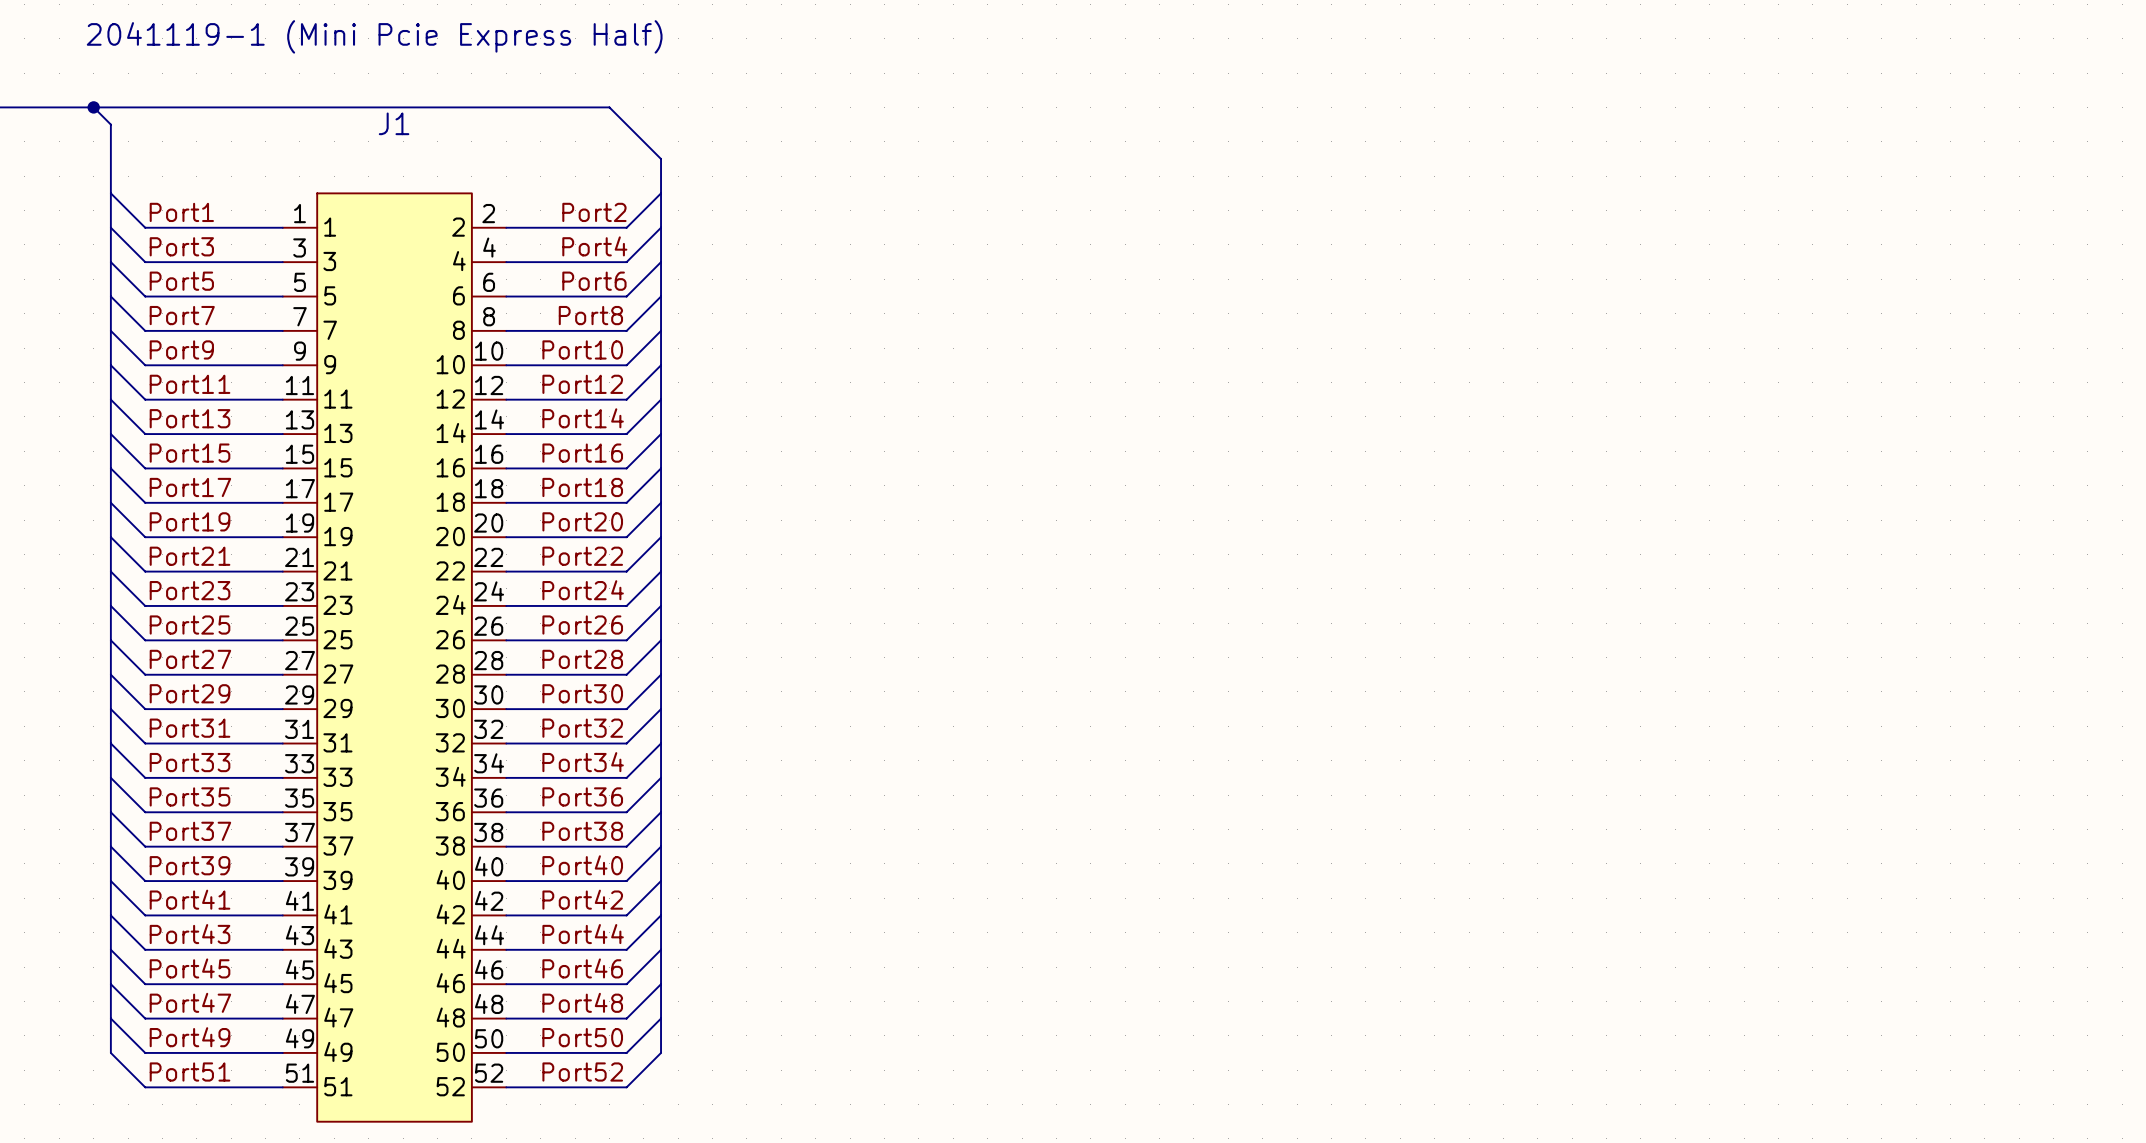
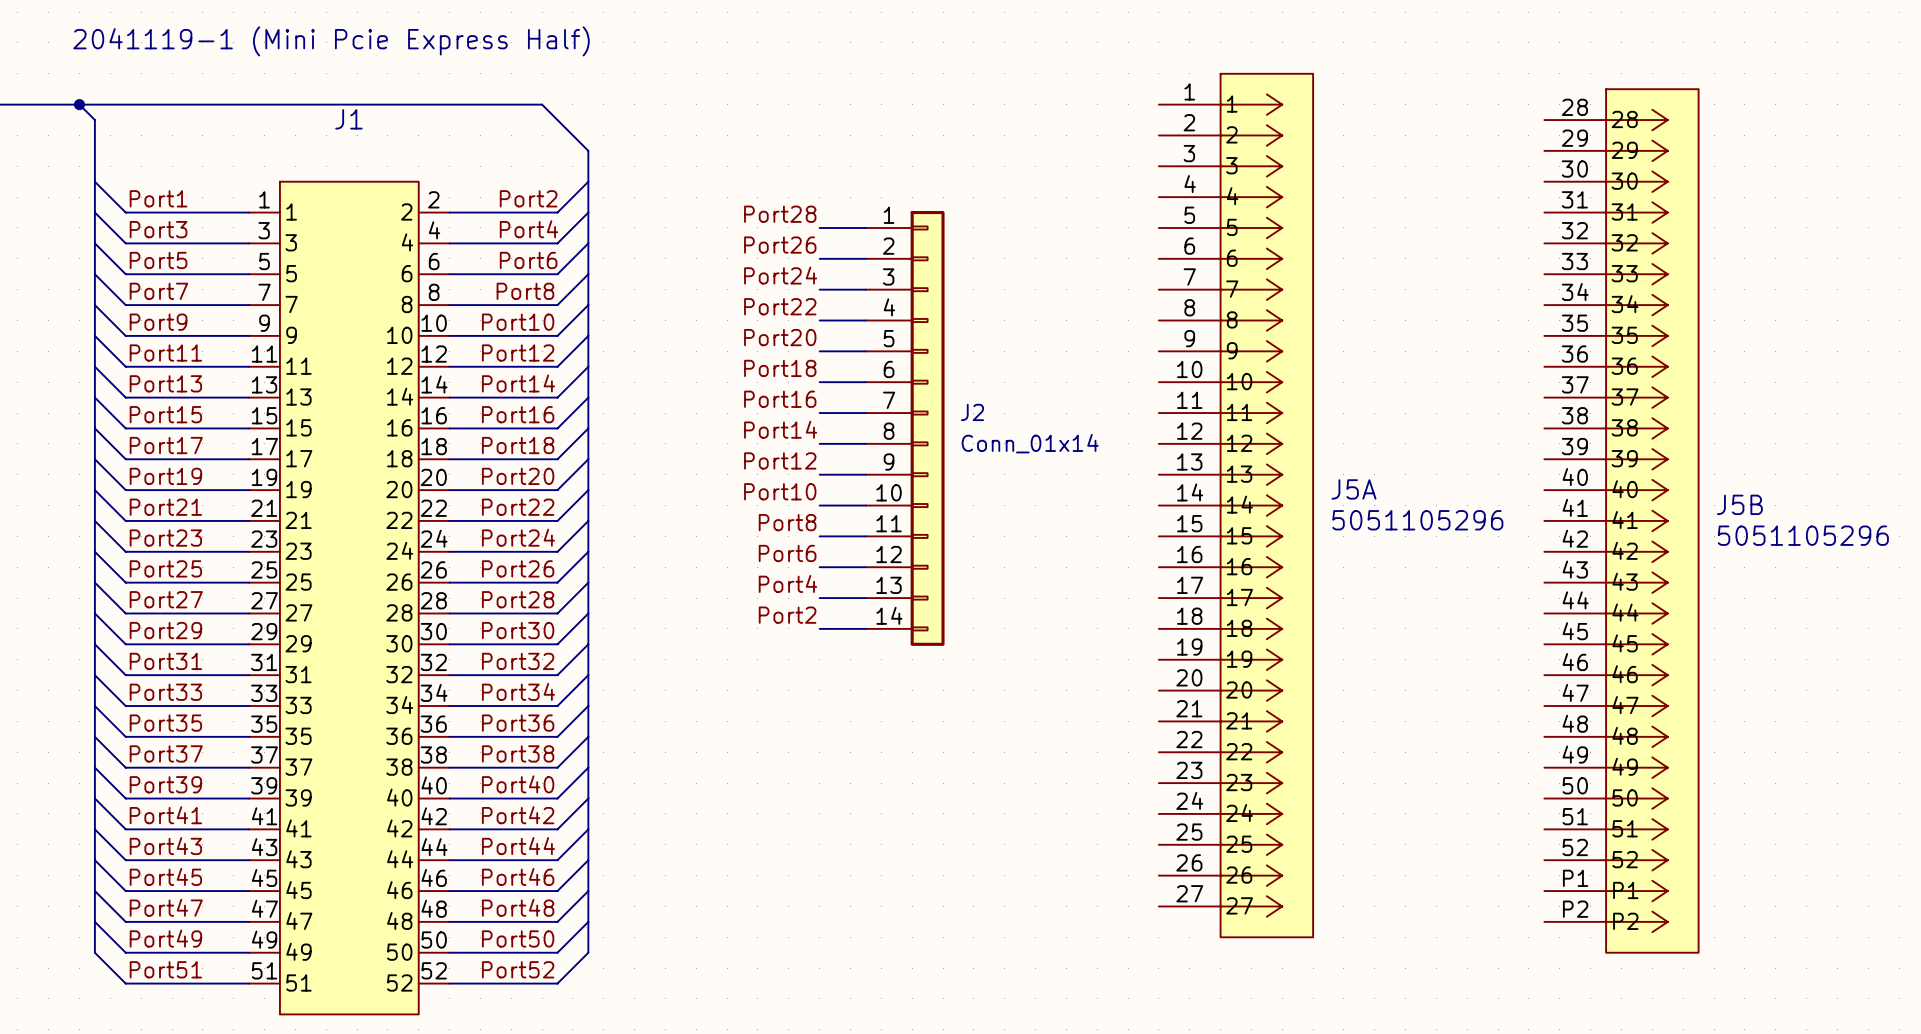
label: none -> Port28 (780, 214)
wire: none -> (819, 227) (865, 227)
label: none -> Port26 (780, 245)
wire: none -> (819, 258) (865, 258)
label: none -> Port24 (780, 275)
wire: none -> (819, 289) (865, 289)
label: none -> Port22 (780, 306)
wire: none -> (819, 320) (865, 320)
label: none -> Port20 (780, 337)
wire: none -> (819, 351) (865, 351)
label: none -> Port18 (780, 368)
wire: none -> (819, 382) (865, 382)
label: none -> Port16 (780, 399)
wire: none -> (819, 413) (865, 413)
J2: none -> Conn_01x14 (905, 428)
label: none -> Port14 (780, 429)
wire: none -> (819, 443) (865, 443)
label: none -> Port12 (780, 460)
wire: none -> (819, 474) (865, 474)
label: none -> Port10 (780, 491)
wire: none -> (819, 505) (865, 505)
J5A: none -> 5051105296 (1236, 505)
J5B: none -> 5051105296 (1621, 520)
label: none -> Port8 (787, 522)
wire: none -> (819, 536) (865, 536)
label: none -> Port6 (787, 553)
wire: none -> (819, 567) (865, 567)
label: none -> Port4 (787, 583)
wire: none -> (819, 598) (865, 598)
label: none -> Port2 (787, 615)
wire: none -> (819, 628) (865, 628)

